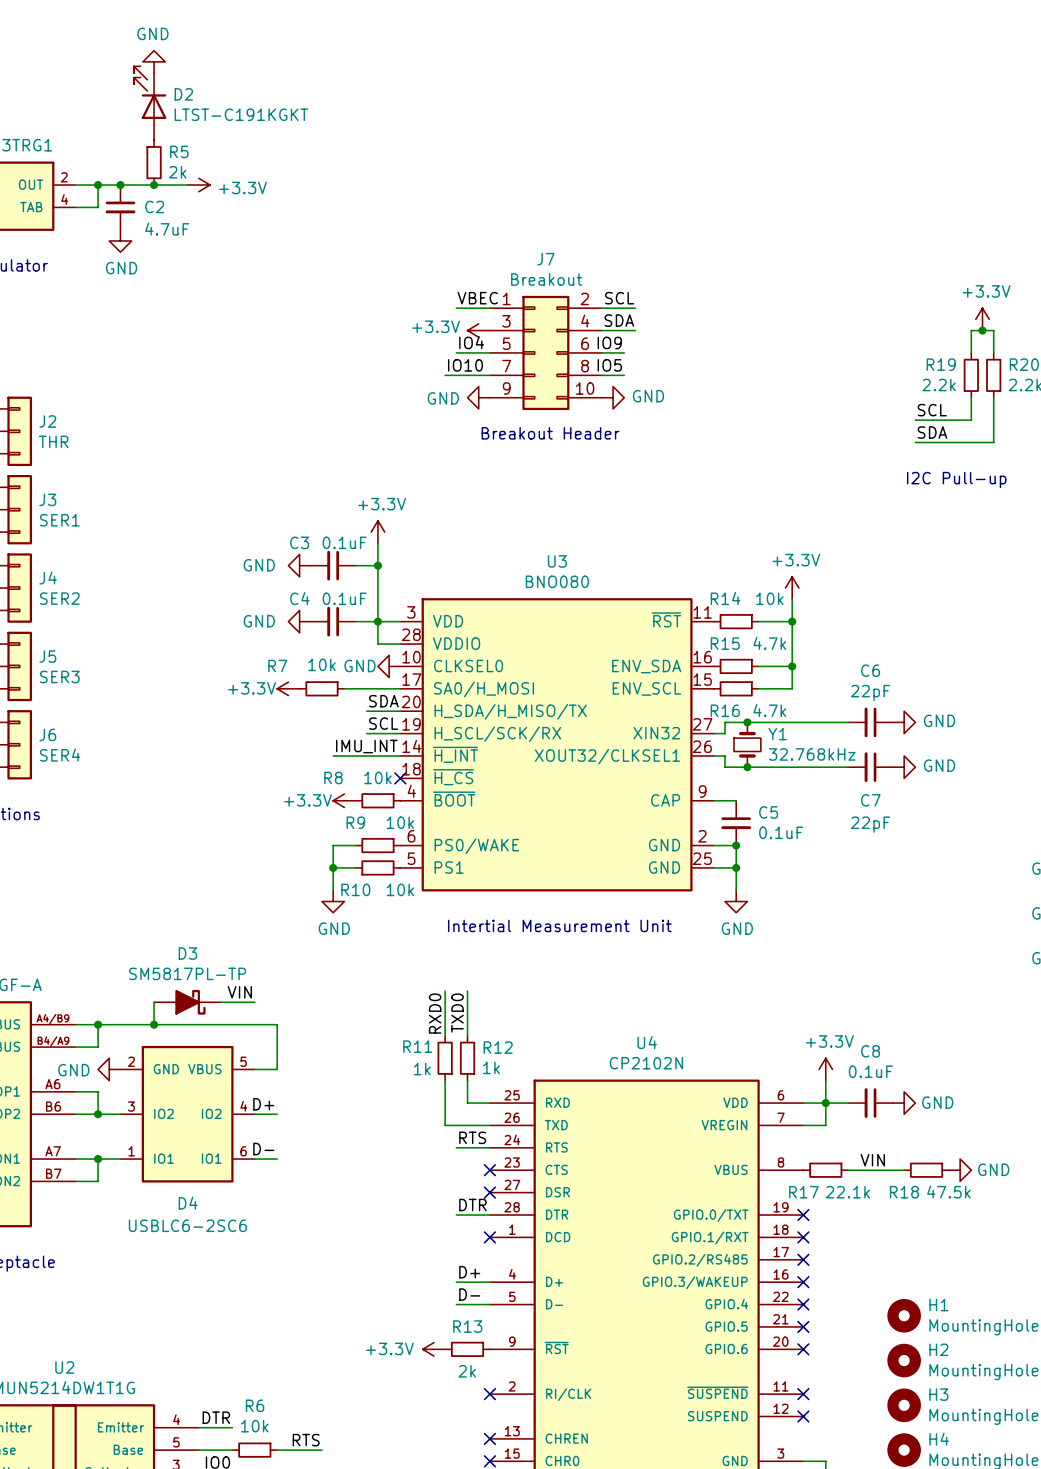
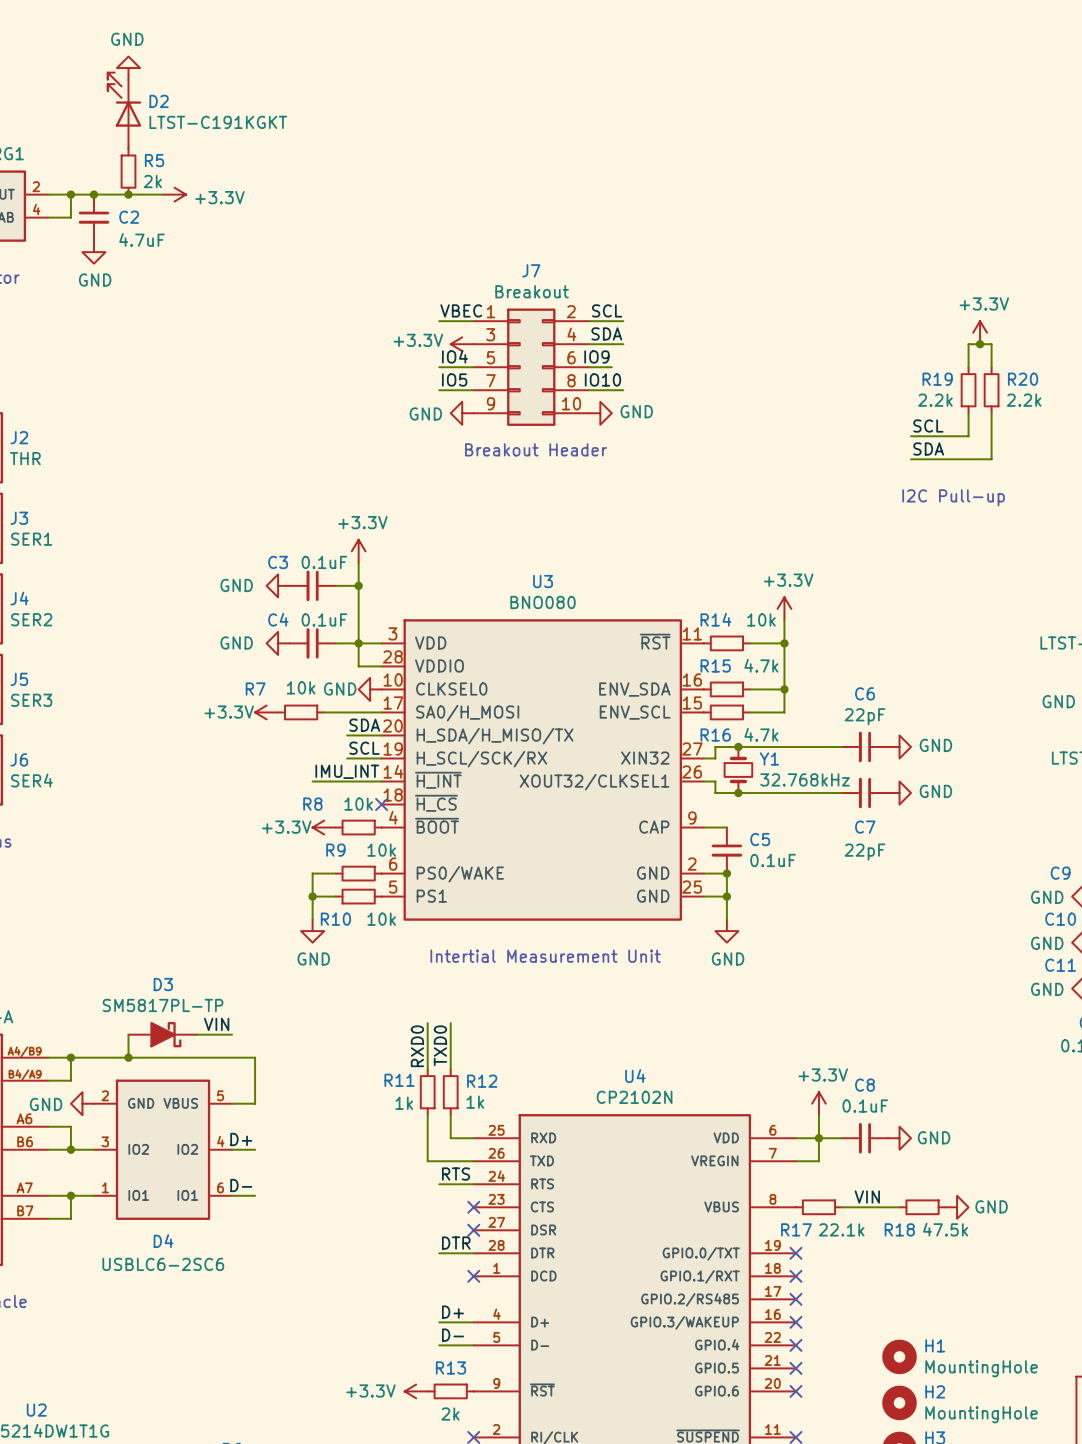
label position: IO10 (465, 365) -> IO10 (602, 379)
label position: IO5 (609, 365) -> IO5 (454, 379)
wire: (445, 375) (456, 375) -> (611, 390) (623, 390)

